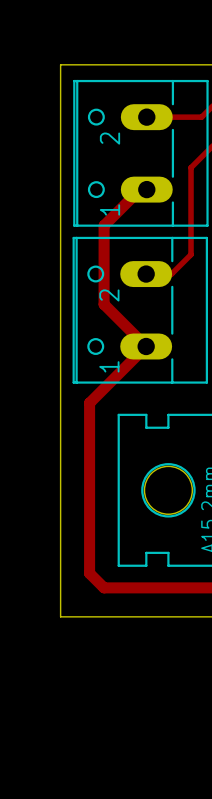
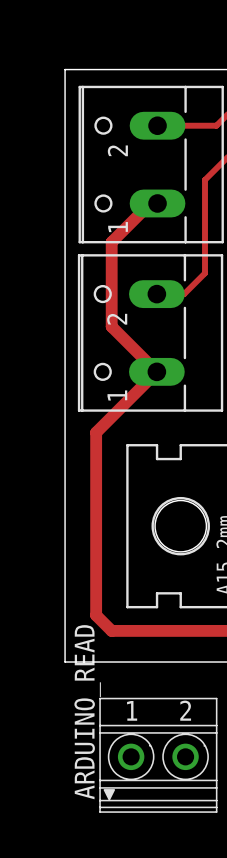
ARDUINO_READ: none -> (158, 755)

